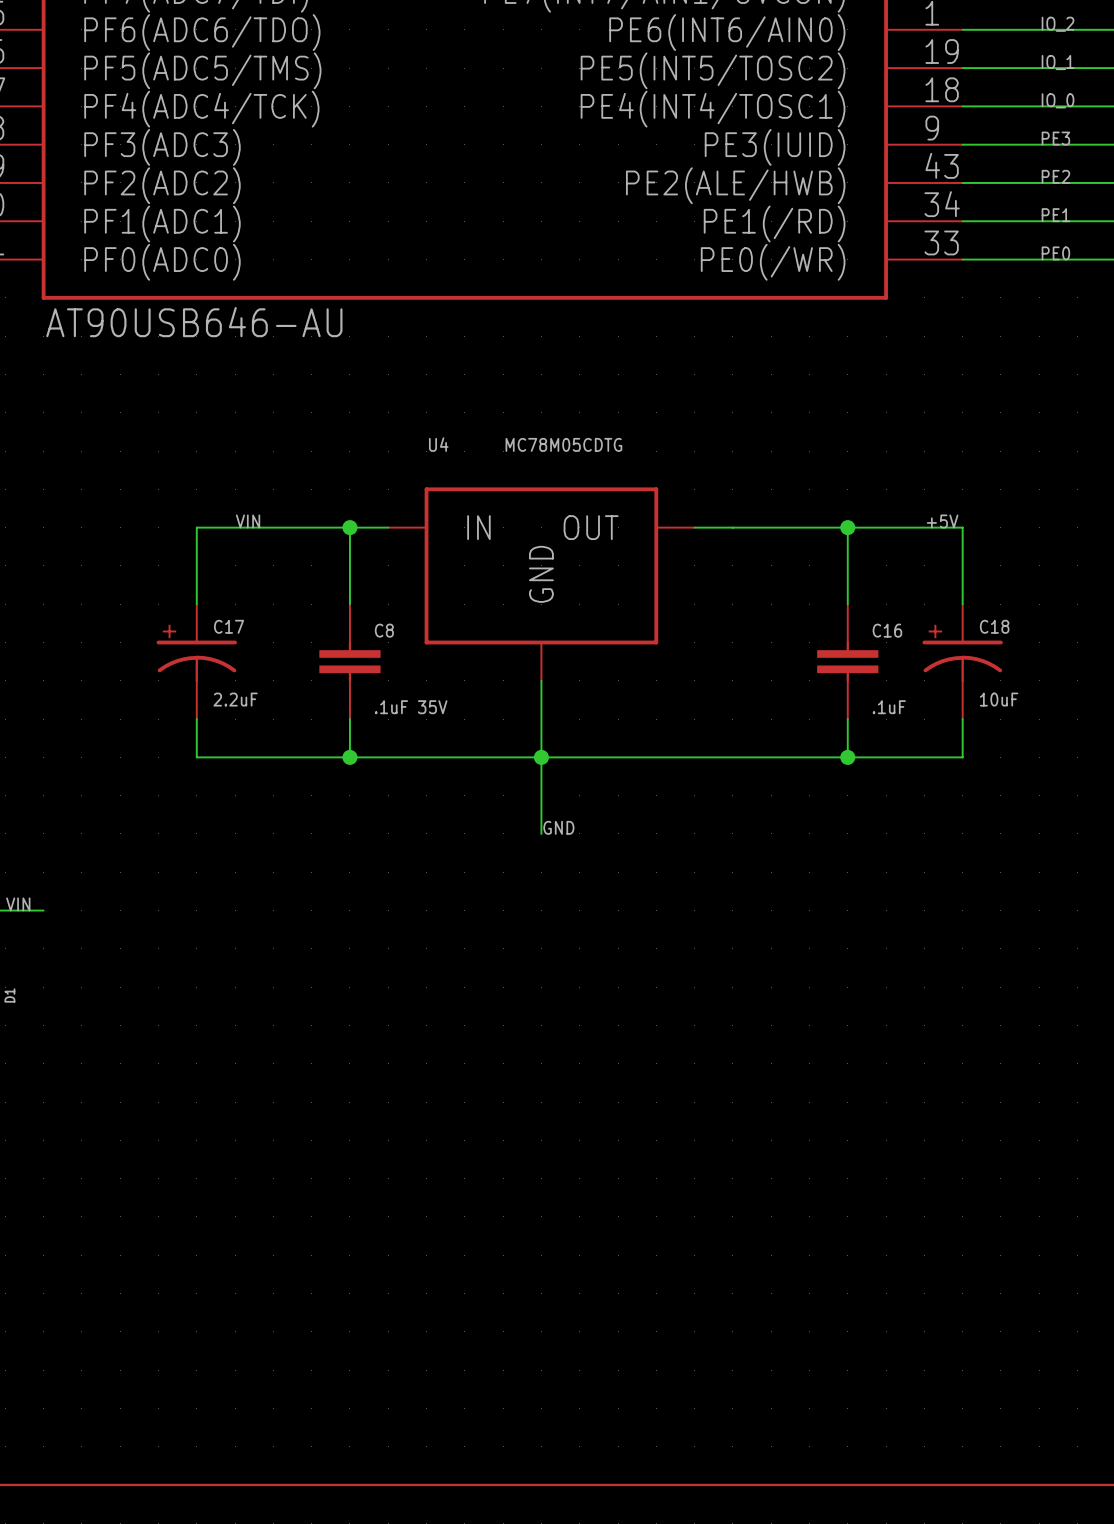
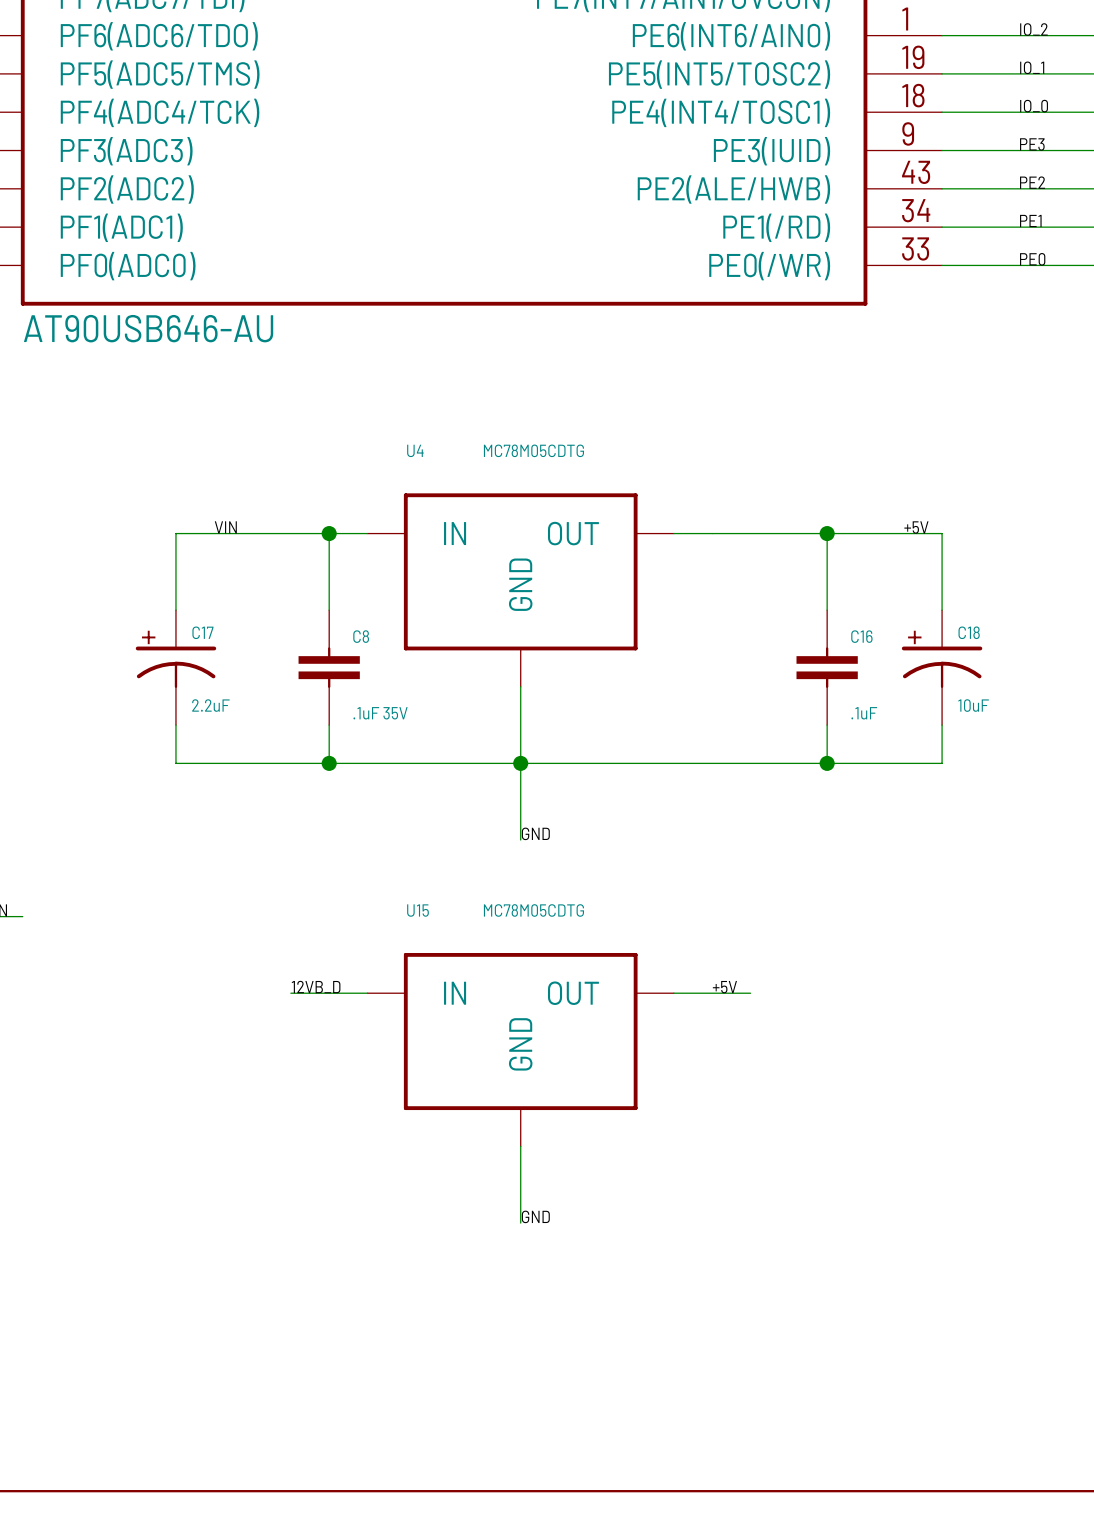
label: none -> 12VB_D (316, 987)
label: none -> +5V (724, 987)
wire: none -> (290, 993) (367, 993)
wire: none -> (673, 993) (750, 993)
U15: none -> MC78M05CDTG (520, 1049)
wire: none -> (520, 1146) (520, 1223)
label: none -> GND (535, 1216)

